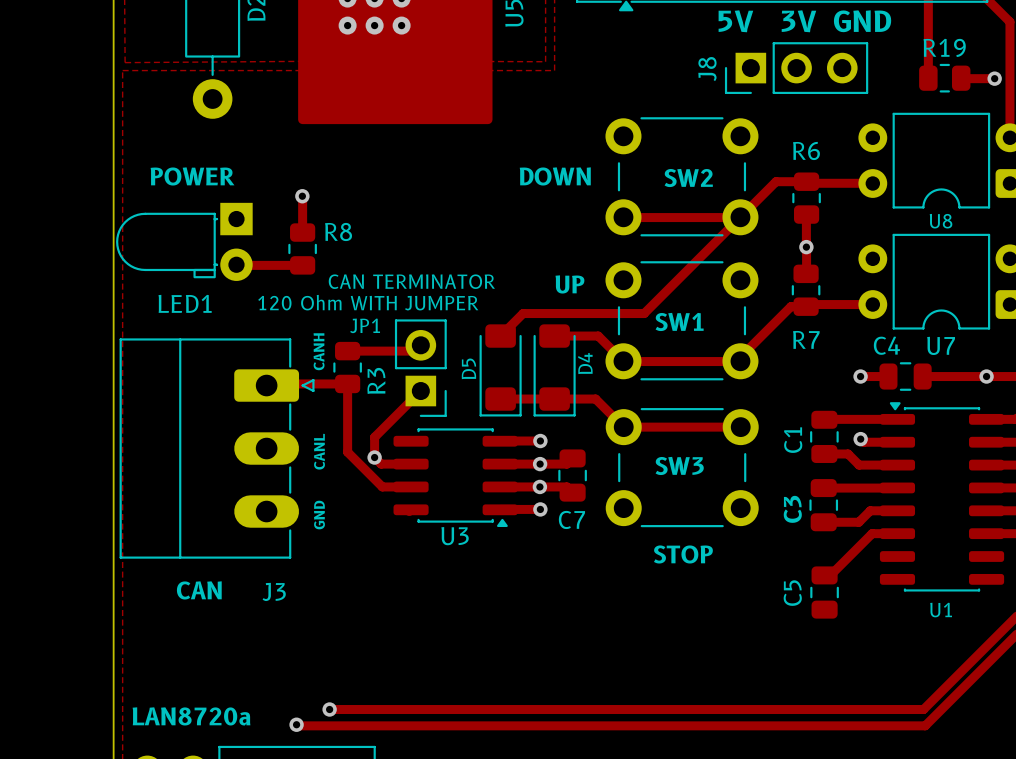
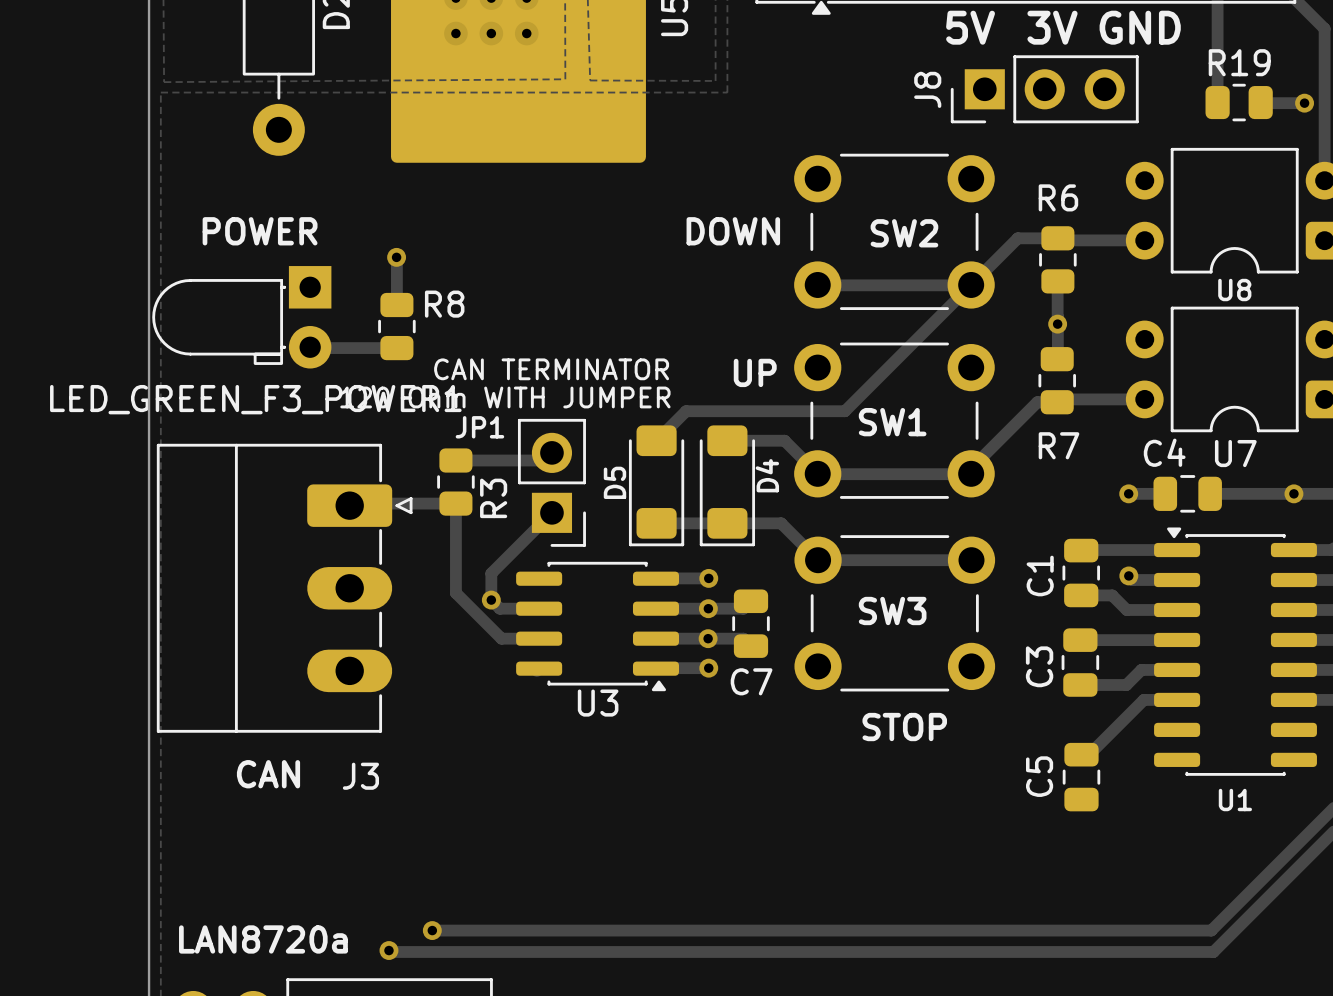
LED1 name: LED1 (185, 303) -> LED_GREEN_F3_POWER1 (255, 399)
text: CANH (319, 351) -> none
text: CANL (319, 451) -> none
text: GND (319, 515) -> none

